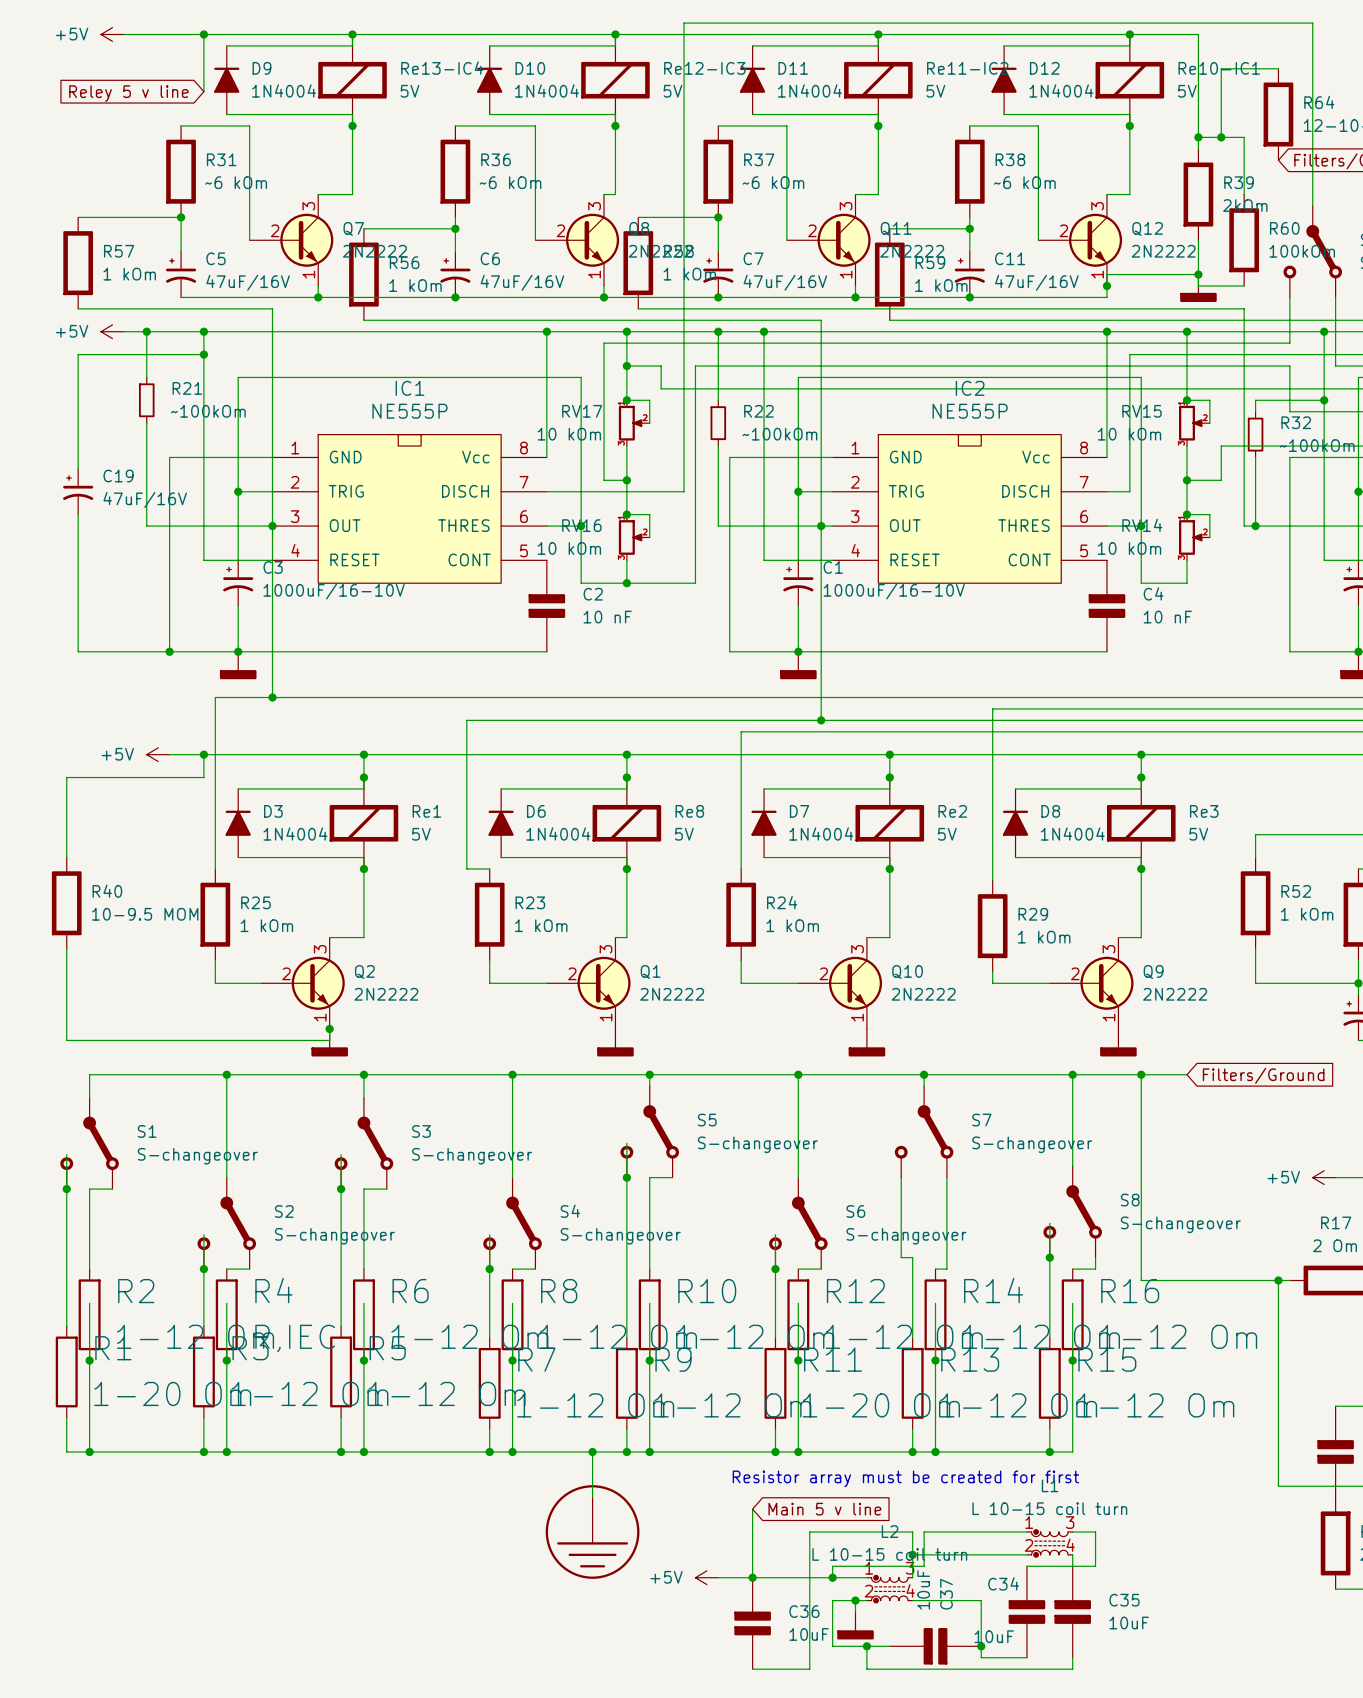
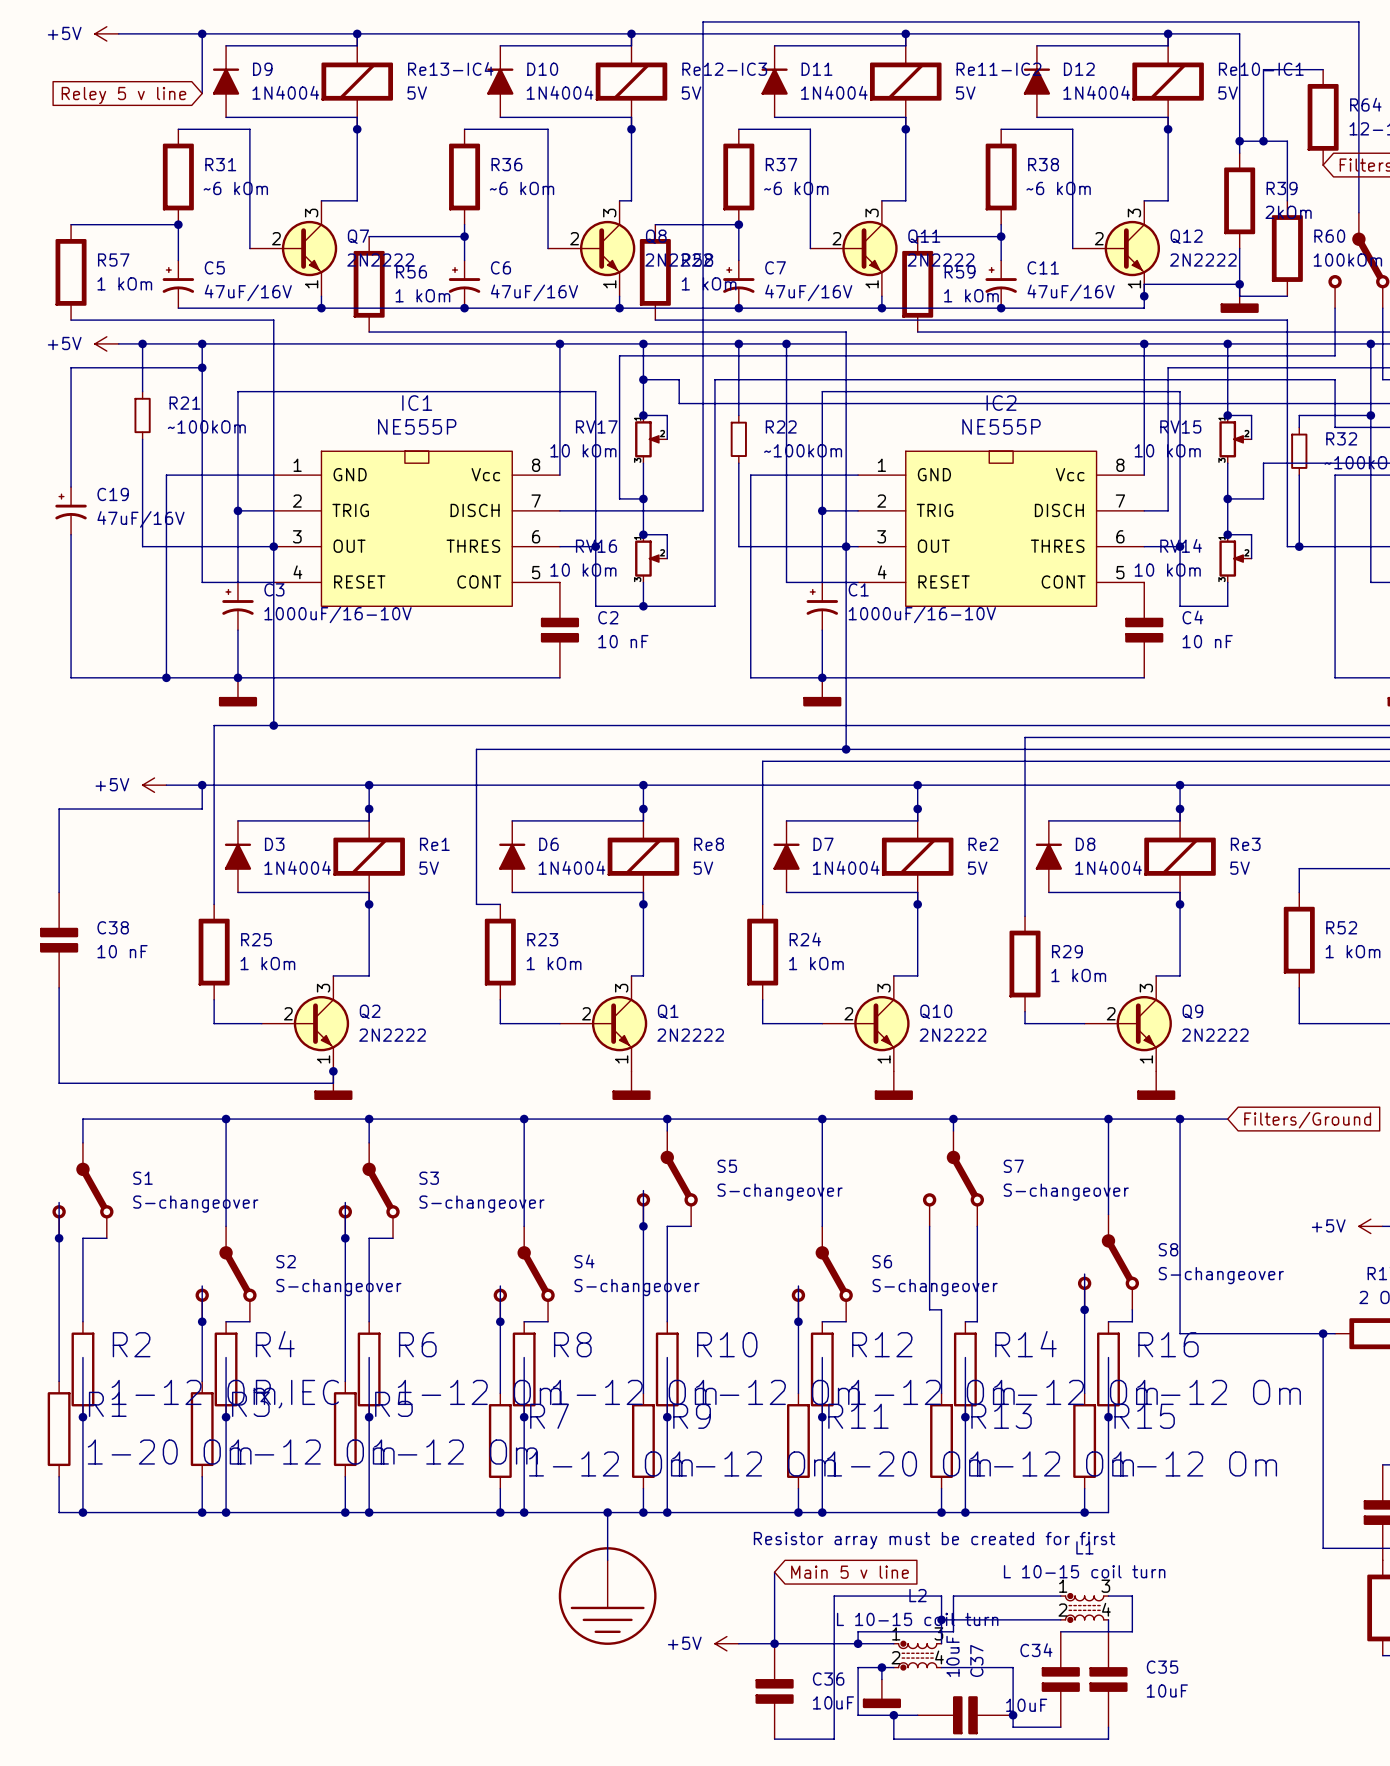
R40: 10-9.5 MOM (66, 903) -> none
C38: none -> 10 nF (59, 940)

